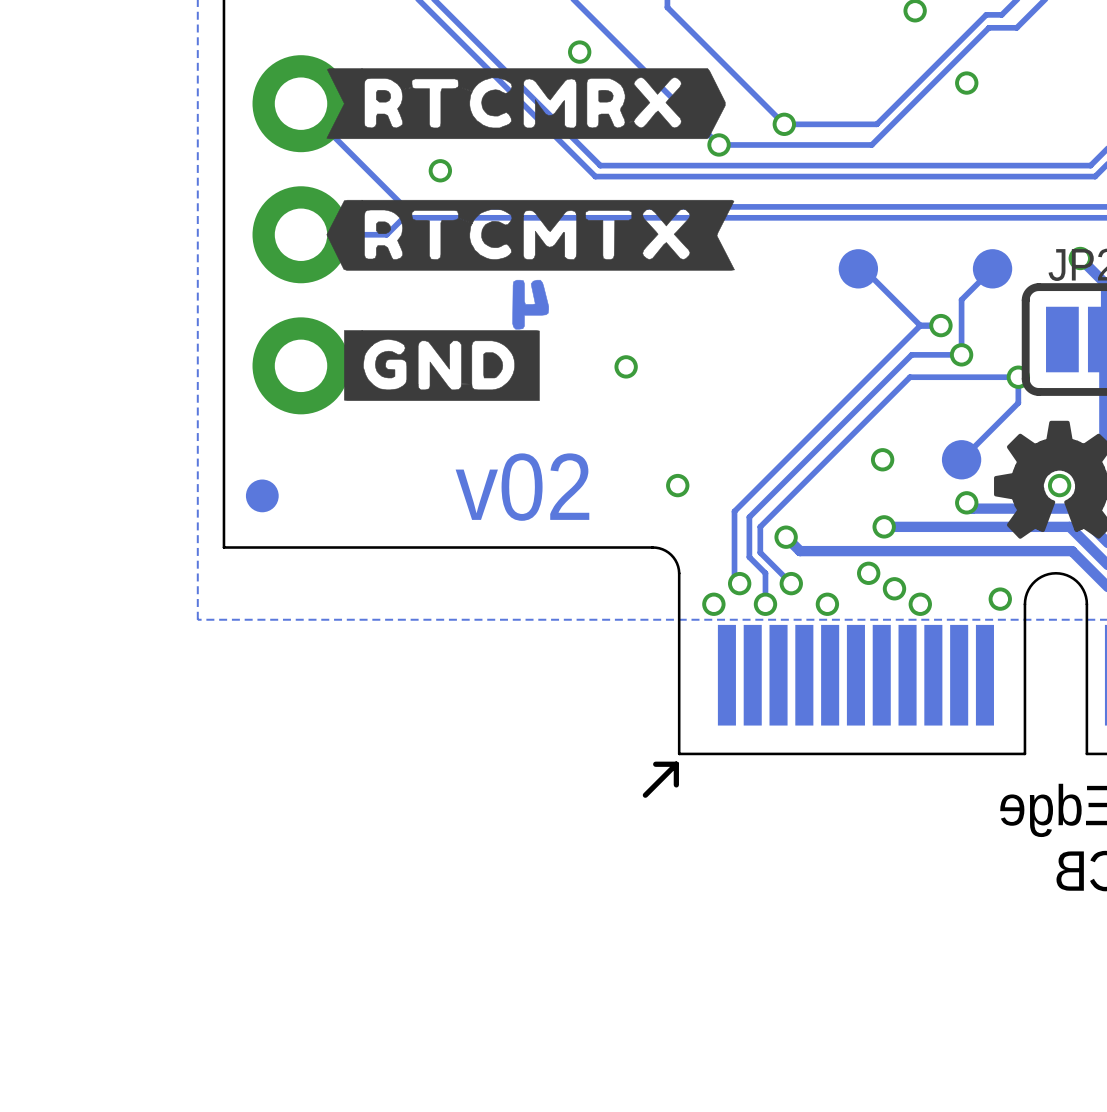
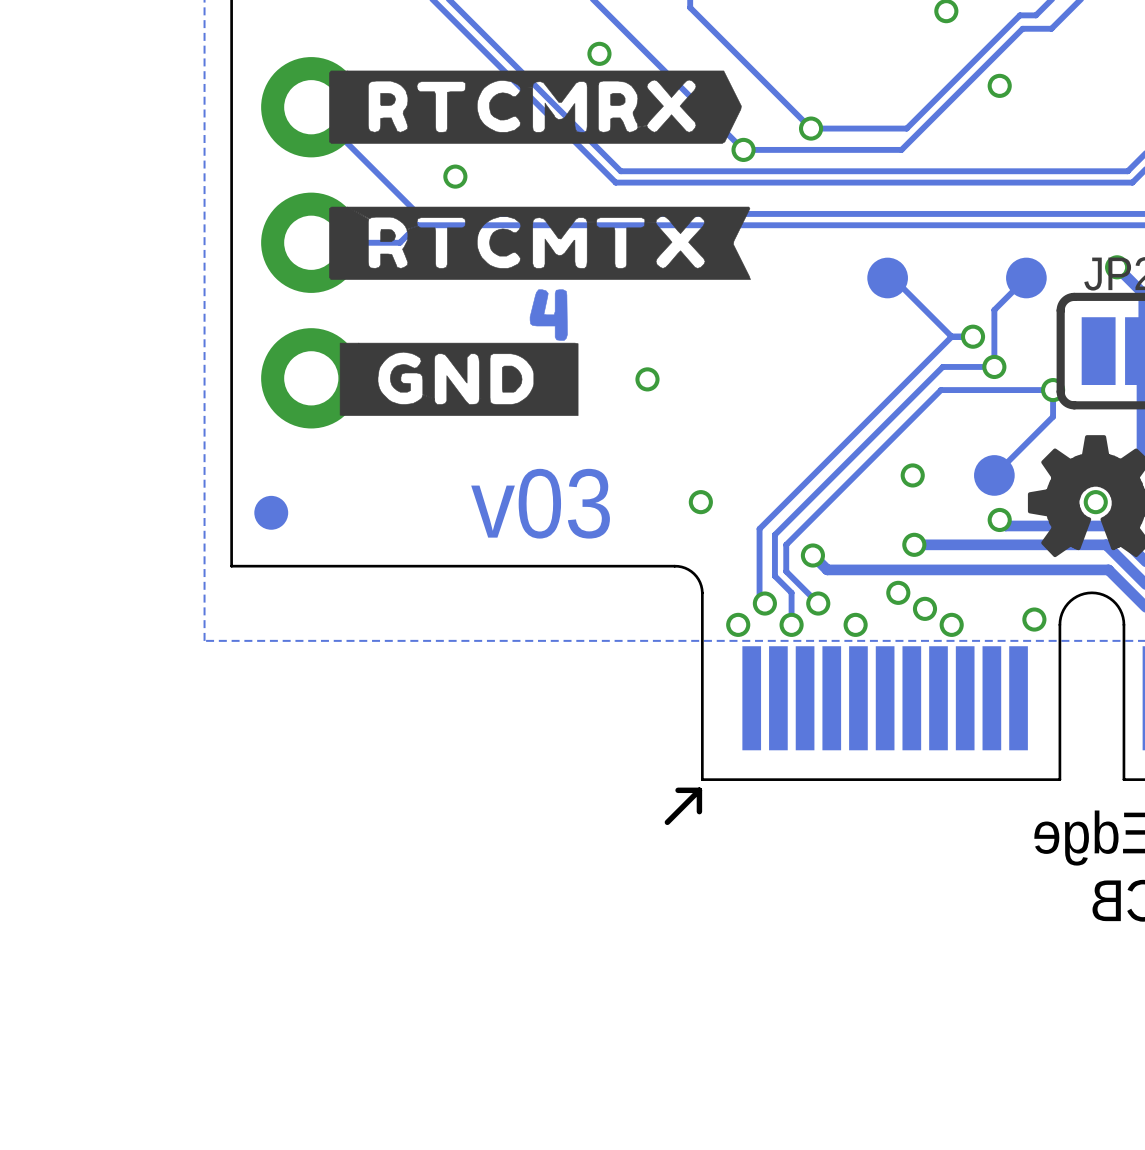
drawing shape: [326, 68, 726, 140] -> [329, 70, 742, 144]
drawing shape: [326, 199, 735, 271] -> [329, 206, 751, 280]
drawing shape: [512, 279, 549, 330] -> [529, 289, 568, 341]
drawing shape: [344, 330, 540, 401] -> [339, 342, 579, 416]
text: v02 (522, 487) -> v03 (540, 503)

